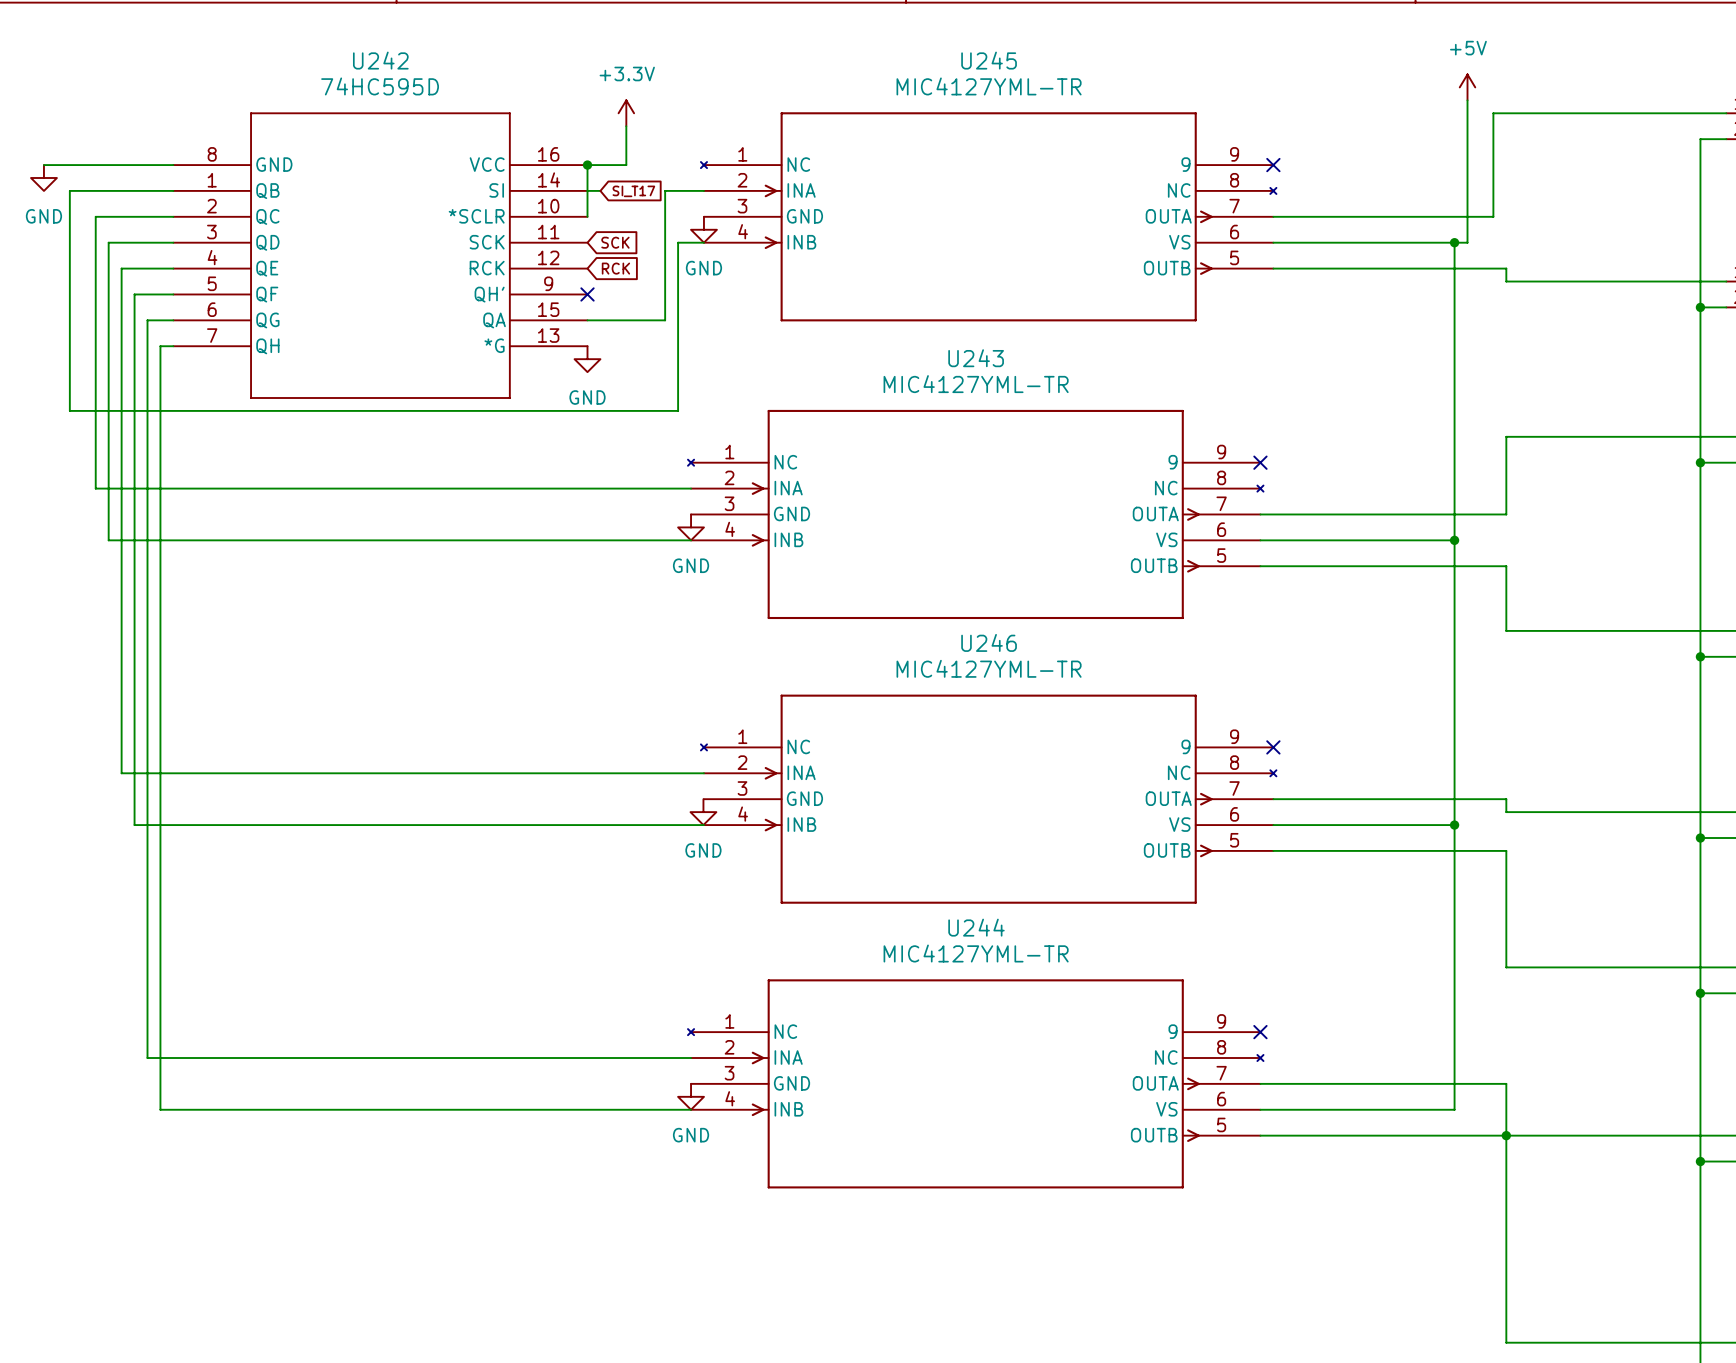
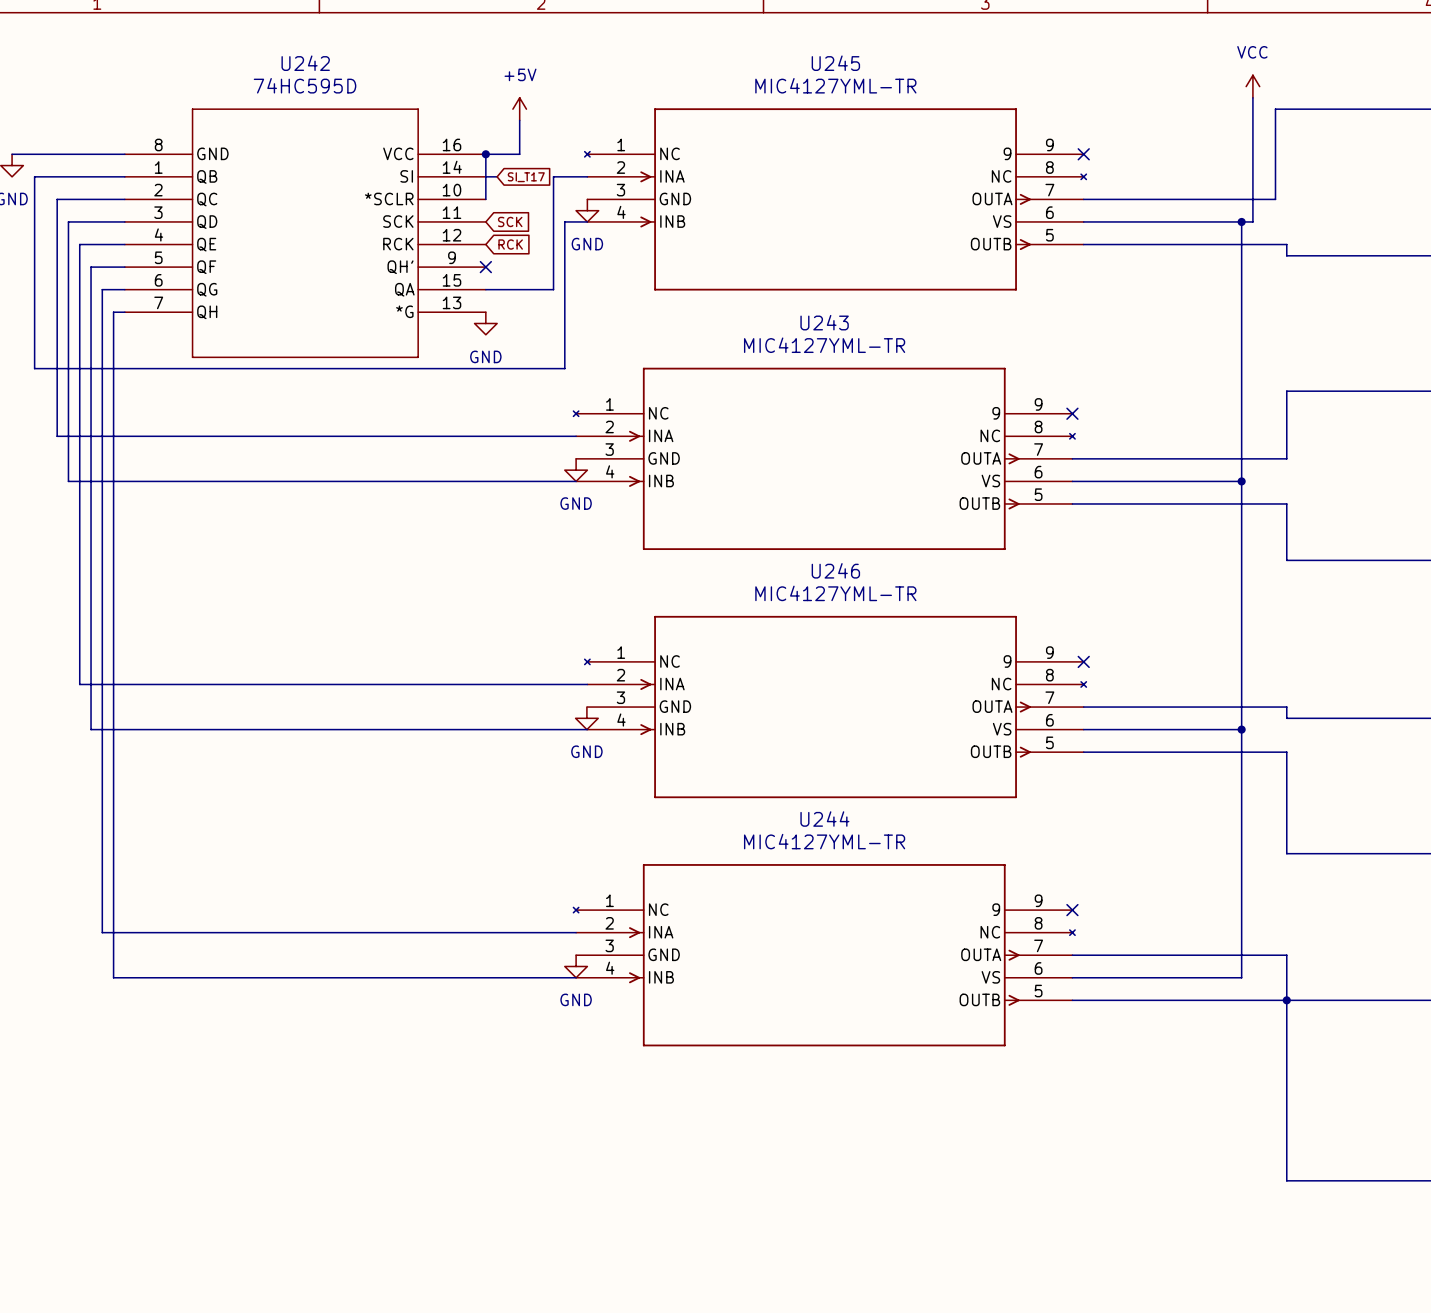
power symbol: +5V (1467, 87) -> VCC (1252, 86)
power symbol: +3.3V (626, 113) -> +5V (519, 109)

